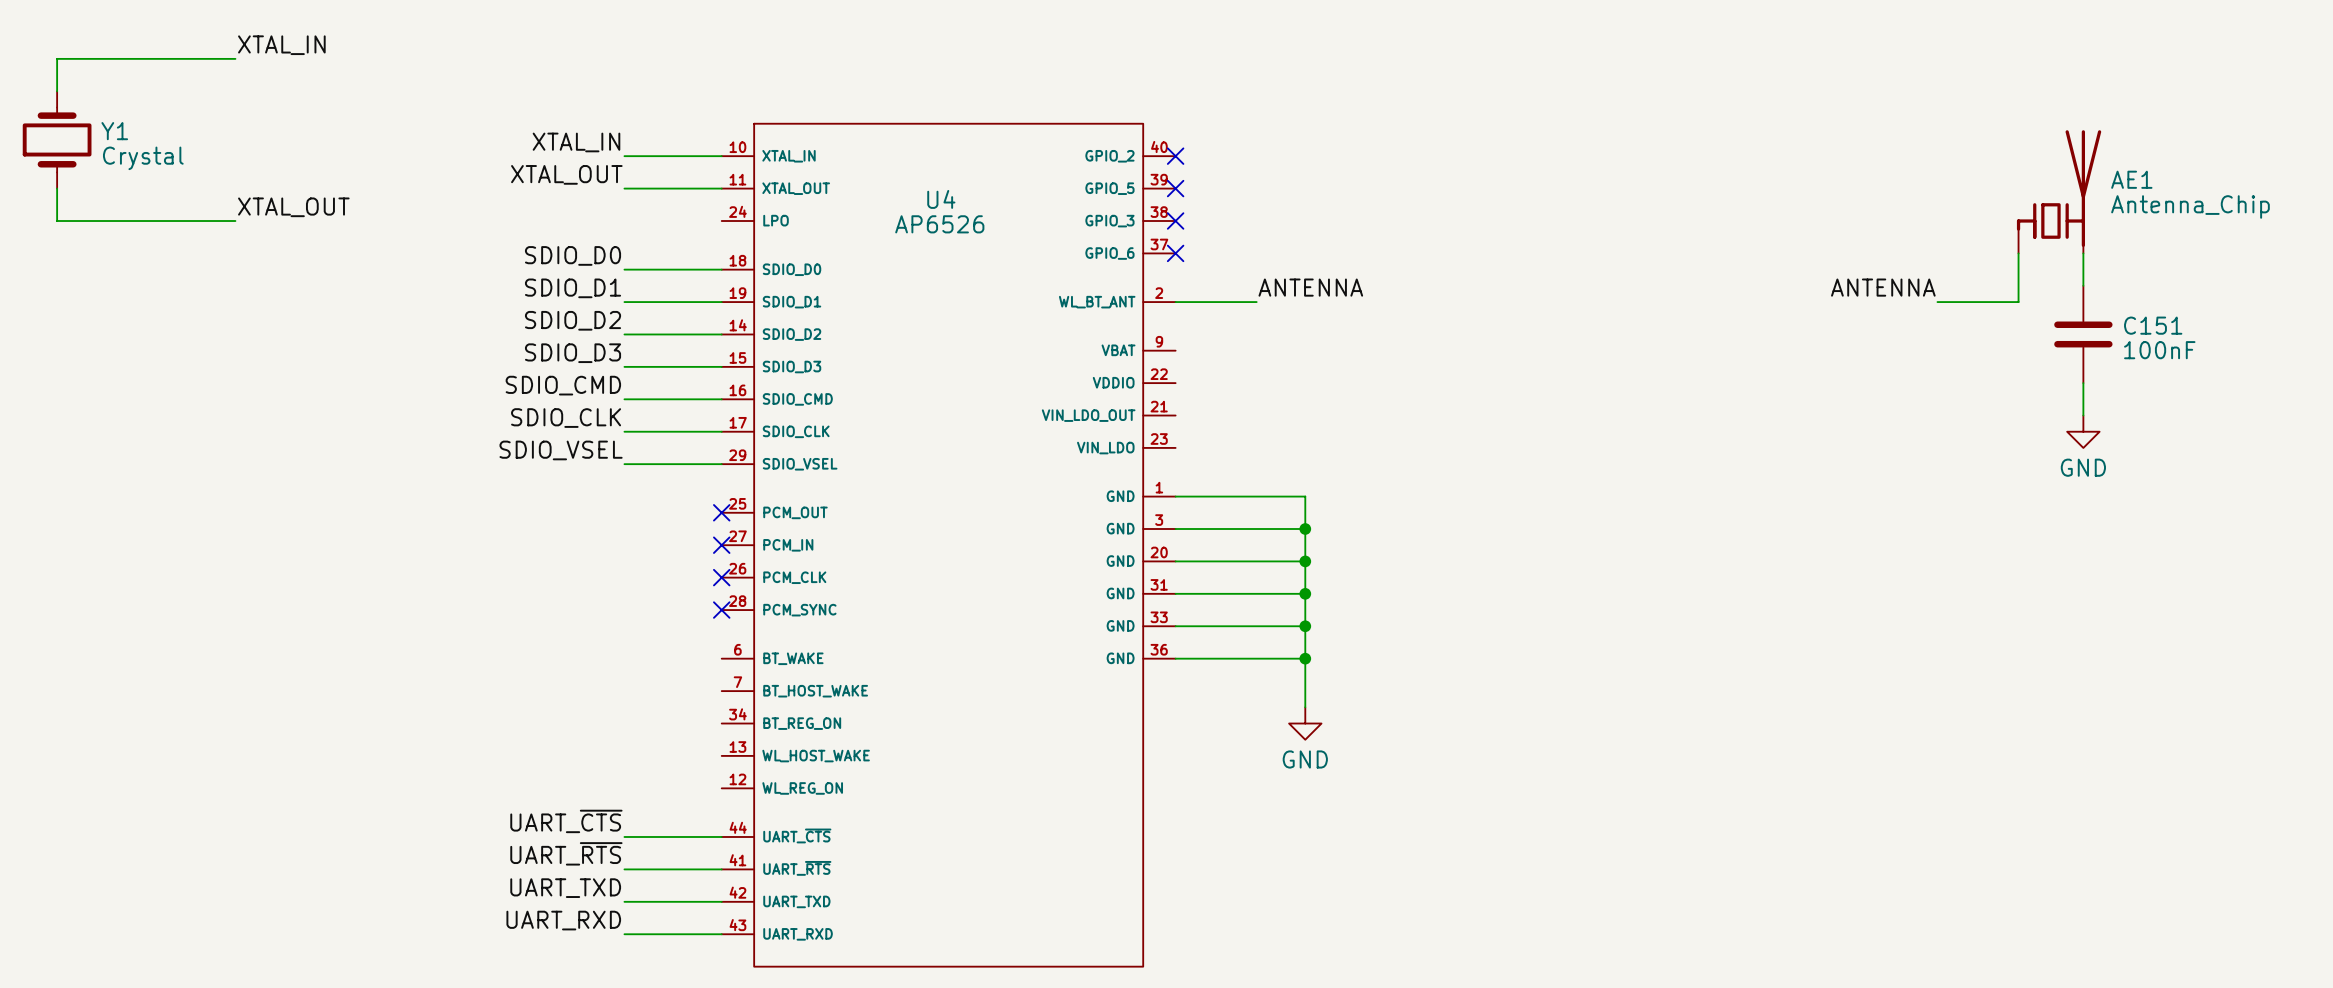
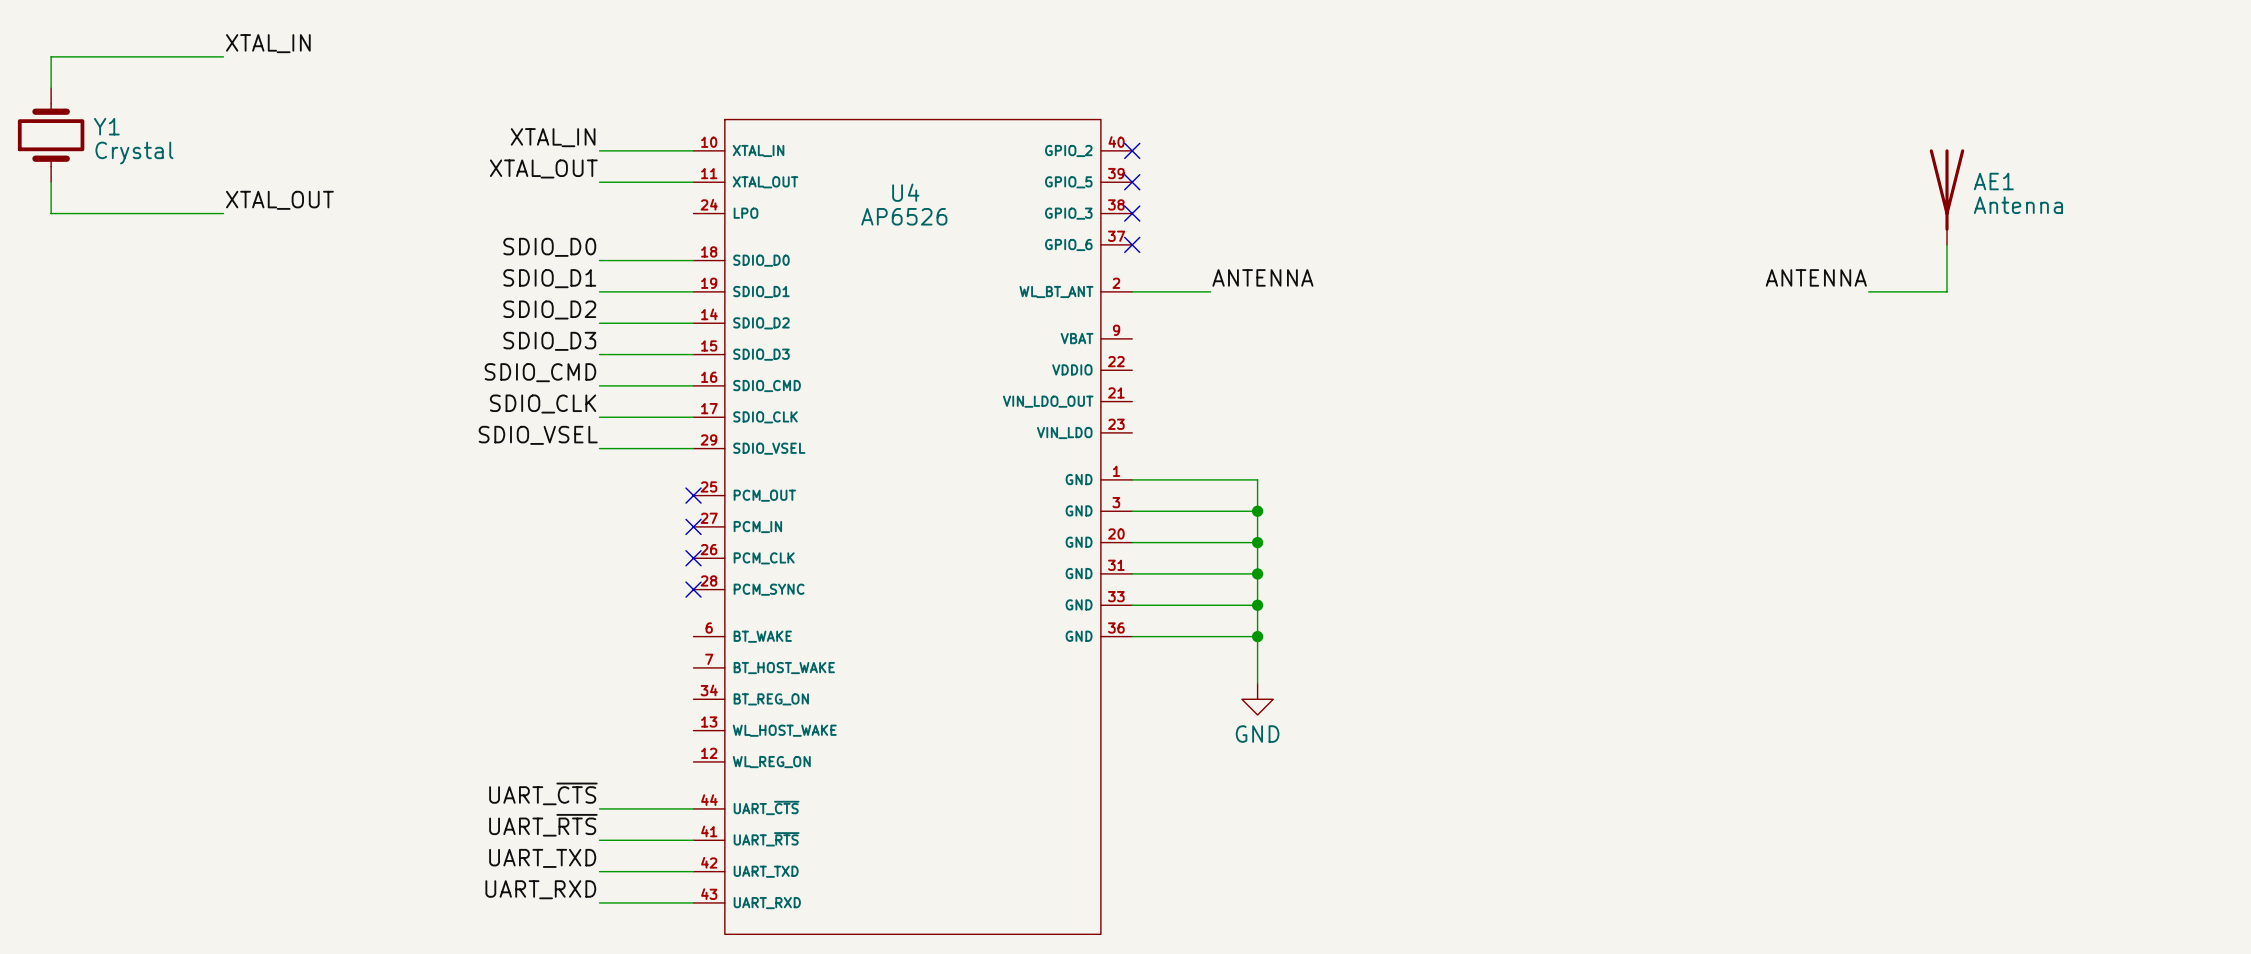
AE1 symbol: [2016, 130, 2102, 254] -> [1929, 149, 1965, 245]
AE1 value: Antenna_Chip (2190, 206) -> Antenna (2018, 205)
wire: (2083, 253) (2083, 285) -> none
C151: 100nF (2083, 334) -> none
wire: (2083, 383) (2083, 415) -> none
power symbol: GND (2083, 431) -> none

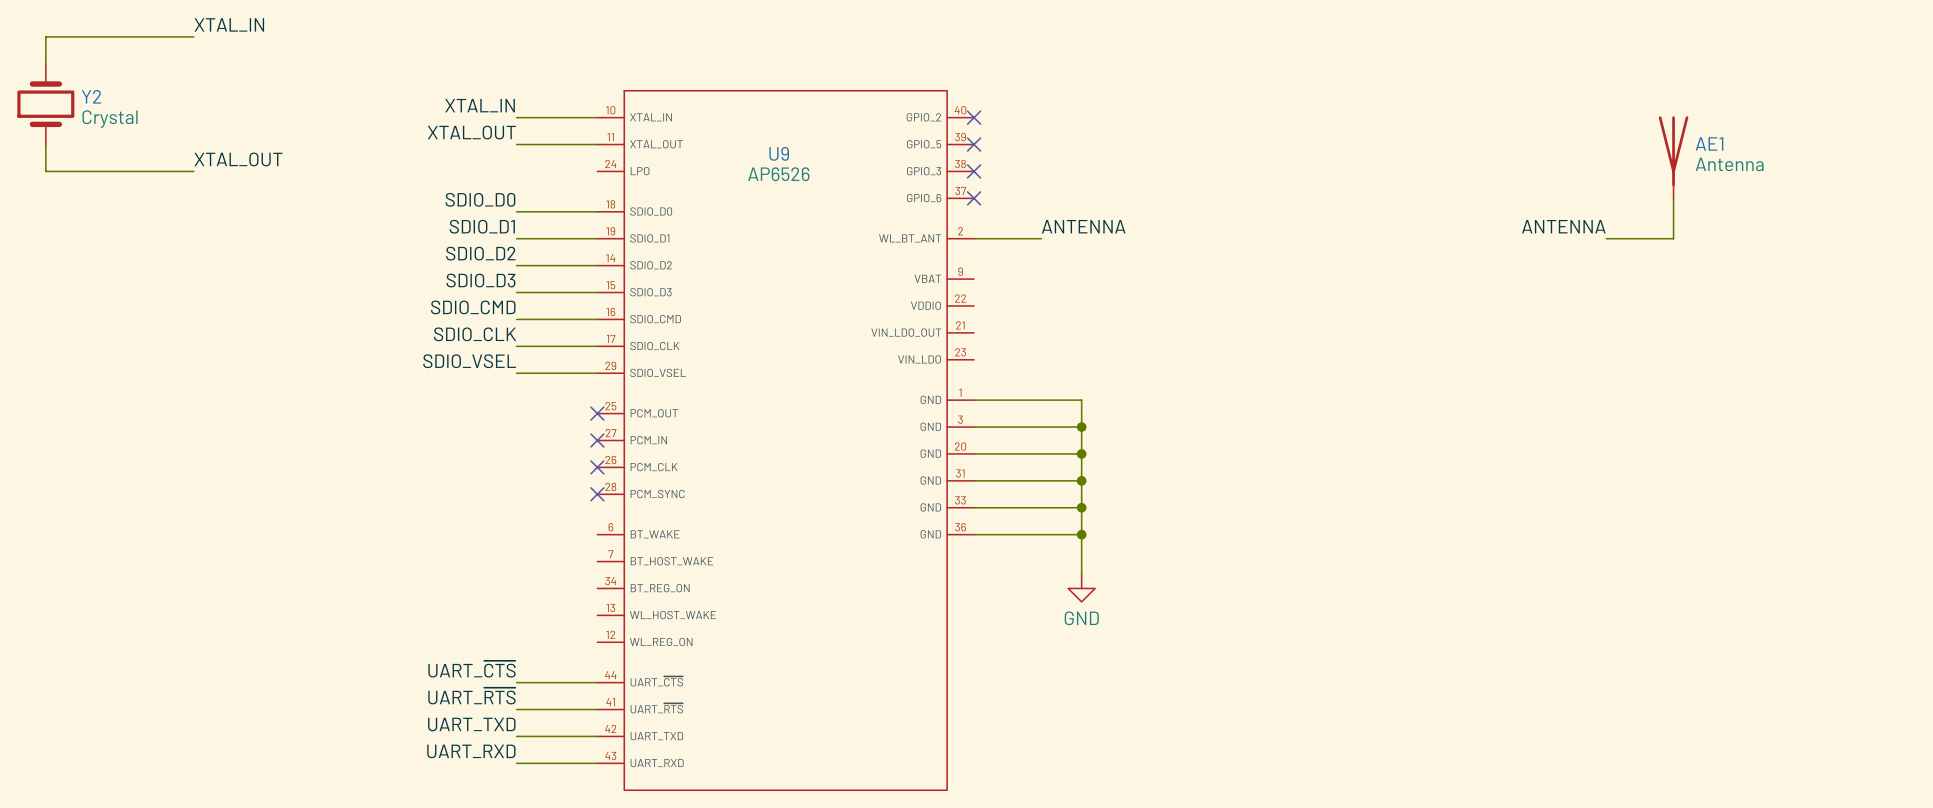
Y1 name: Y1 (106, 126) -> Y2 (91, 96)
U4 name: U4 (905, 192) -> U9 (779, 153)

